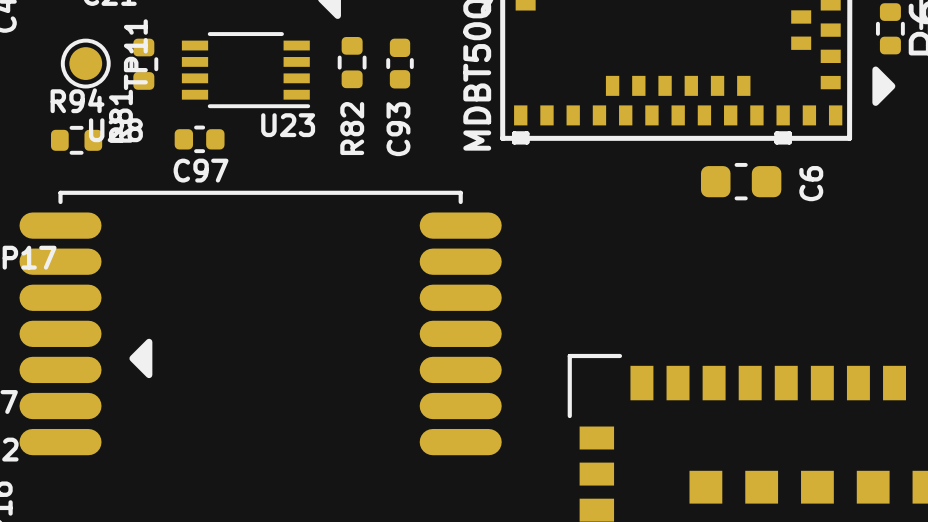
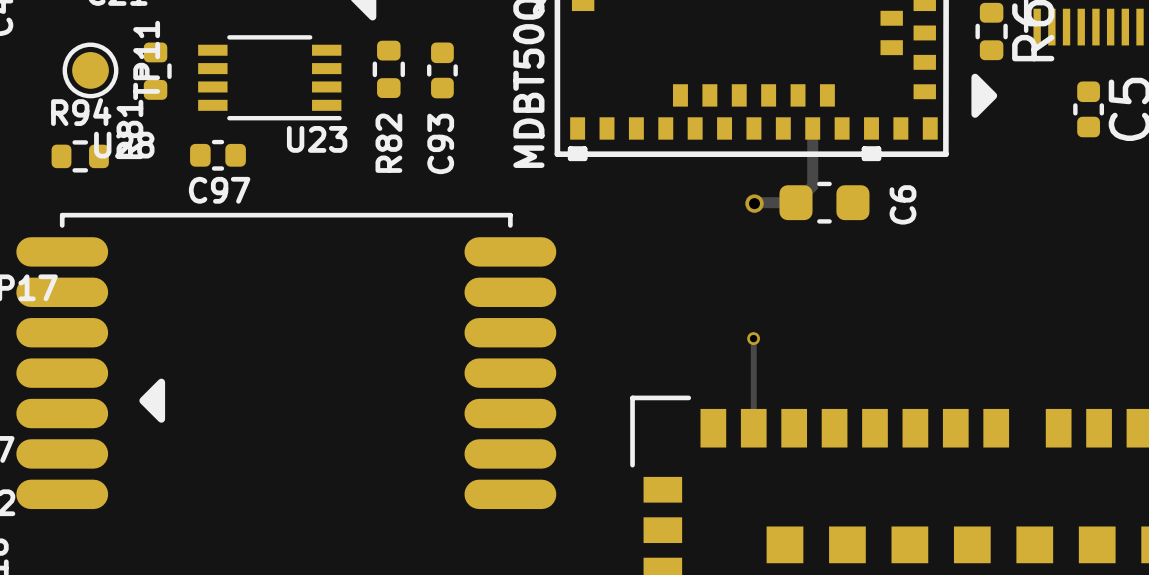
track: none -> (812, 128) (812, 185) (796, 202) (754, 203)
via: none -> (754, 203)
via: none -> (753, 338)
track: none -> (753, 338) (753, 428)

